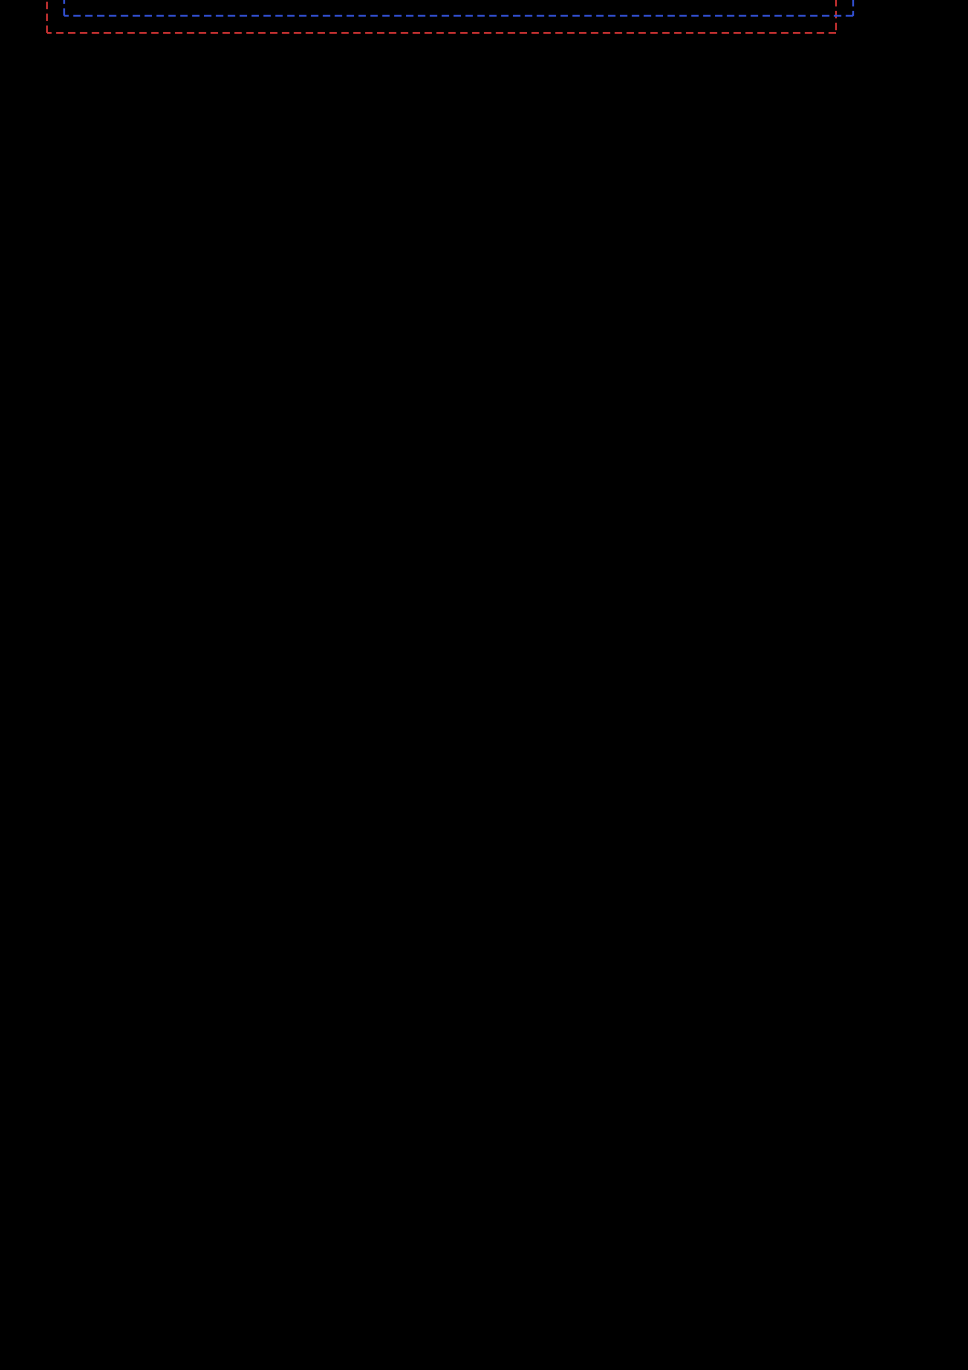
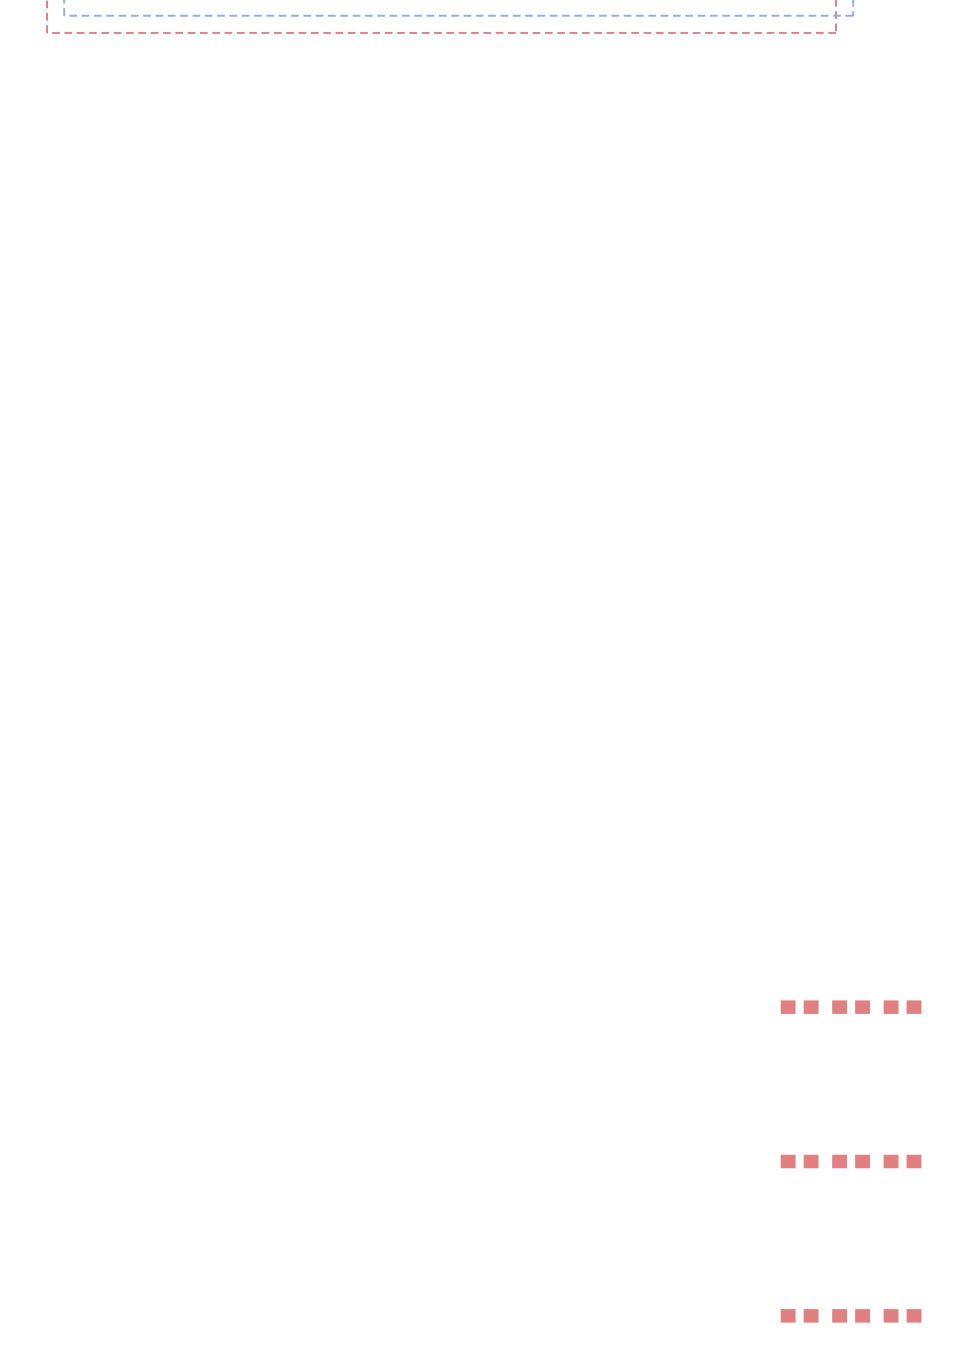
part: none -> (799, 1007)
part: none -> (851, 1007)
part: none -> (902, 1007)
part: none -> (799, 1161)
part: none -> (851, 1161)
part: none -> (902, 1161)
part: none -> (799, 1315)
part: none -> (851, 1315)
part: none -> (902, 1315)

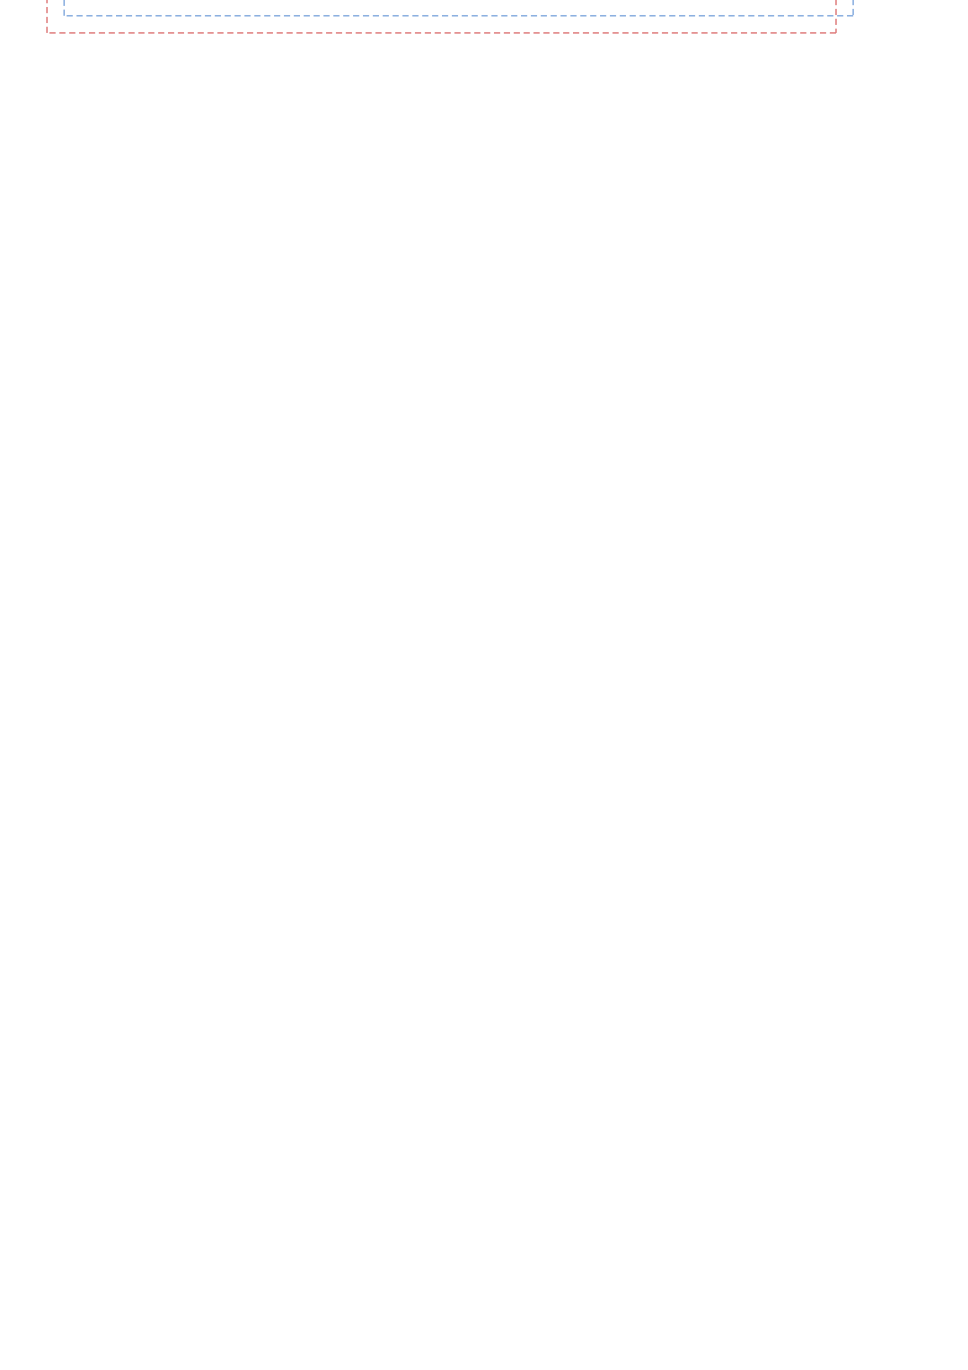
part: (799, 1007) -> none
part: (851, 1007) -> none
part: (902, 1007) -> none
part: (799, 1161) -> none
part: (851, 1161) -> none
part: (902, 1161) -> none
part: (799, 1315) -> none
part: (851, 1315) -> none
part: (902, 1315) -> none

